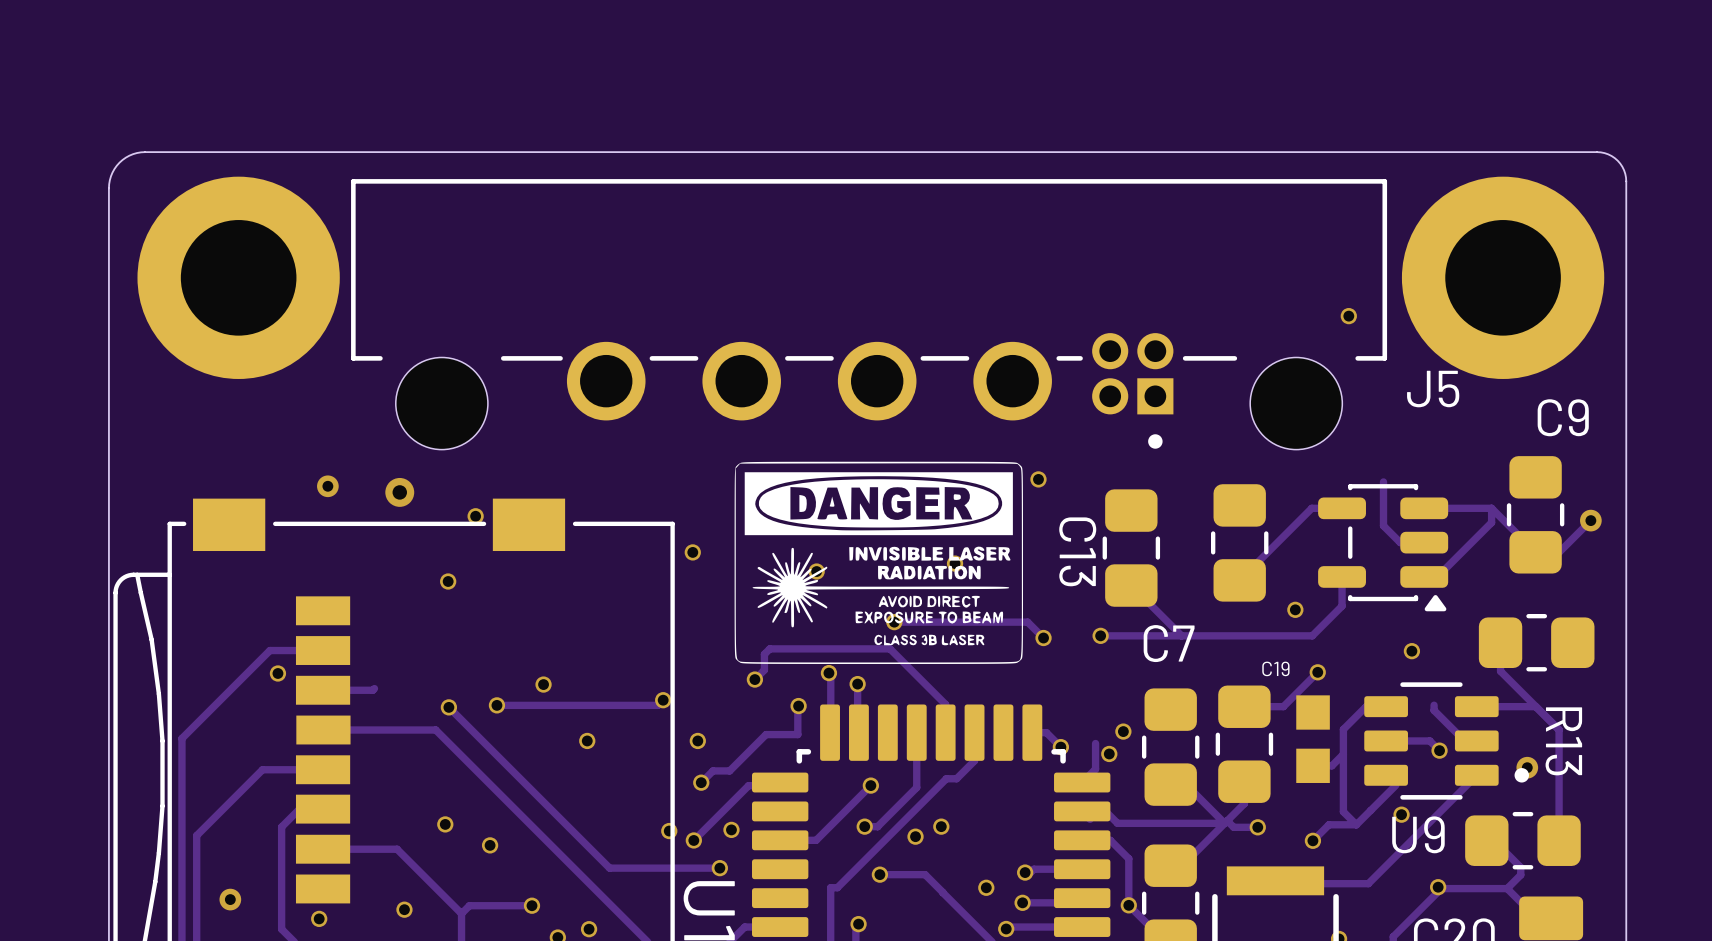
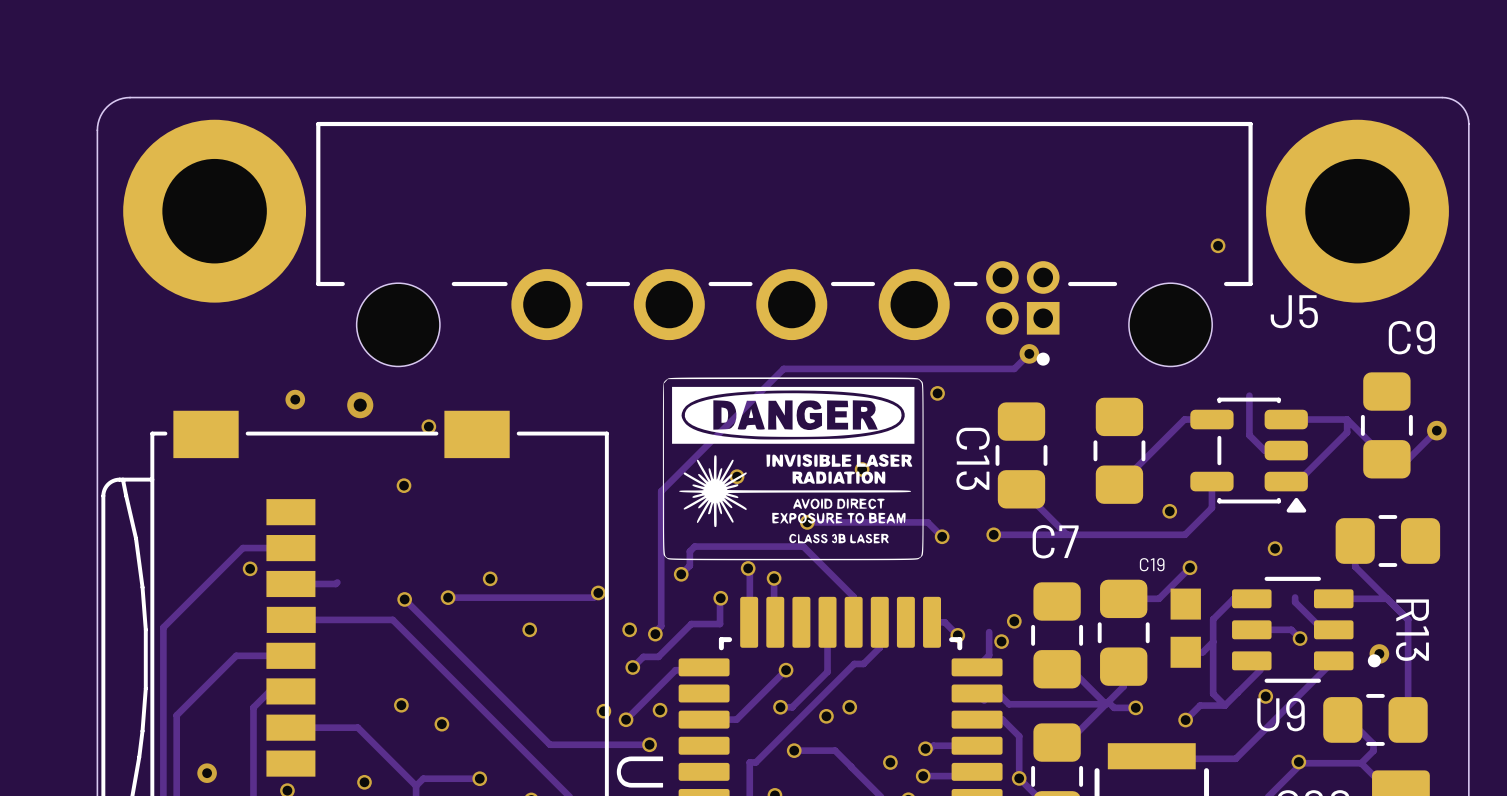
track: none -> (1029, 353) (1014, 368) (783, 368) (661, 491) (661, 626) (654, 633)
via: none -> (1029, 353)
via position: (692, 552) -> (655, 634)

